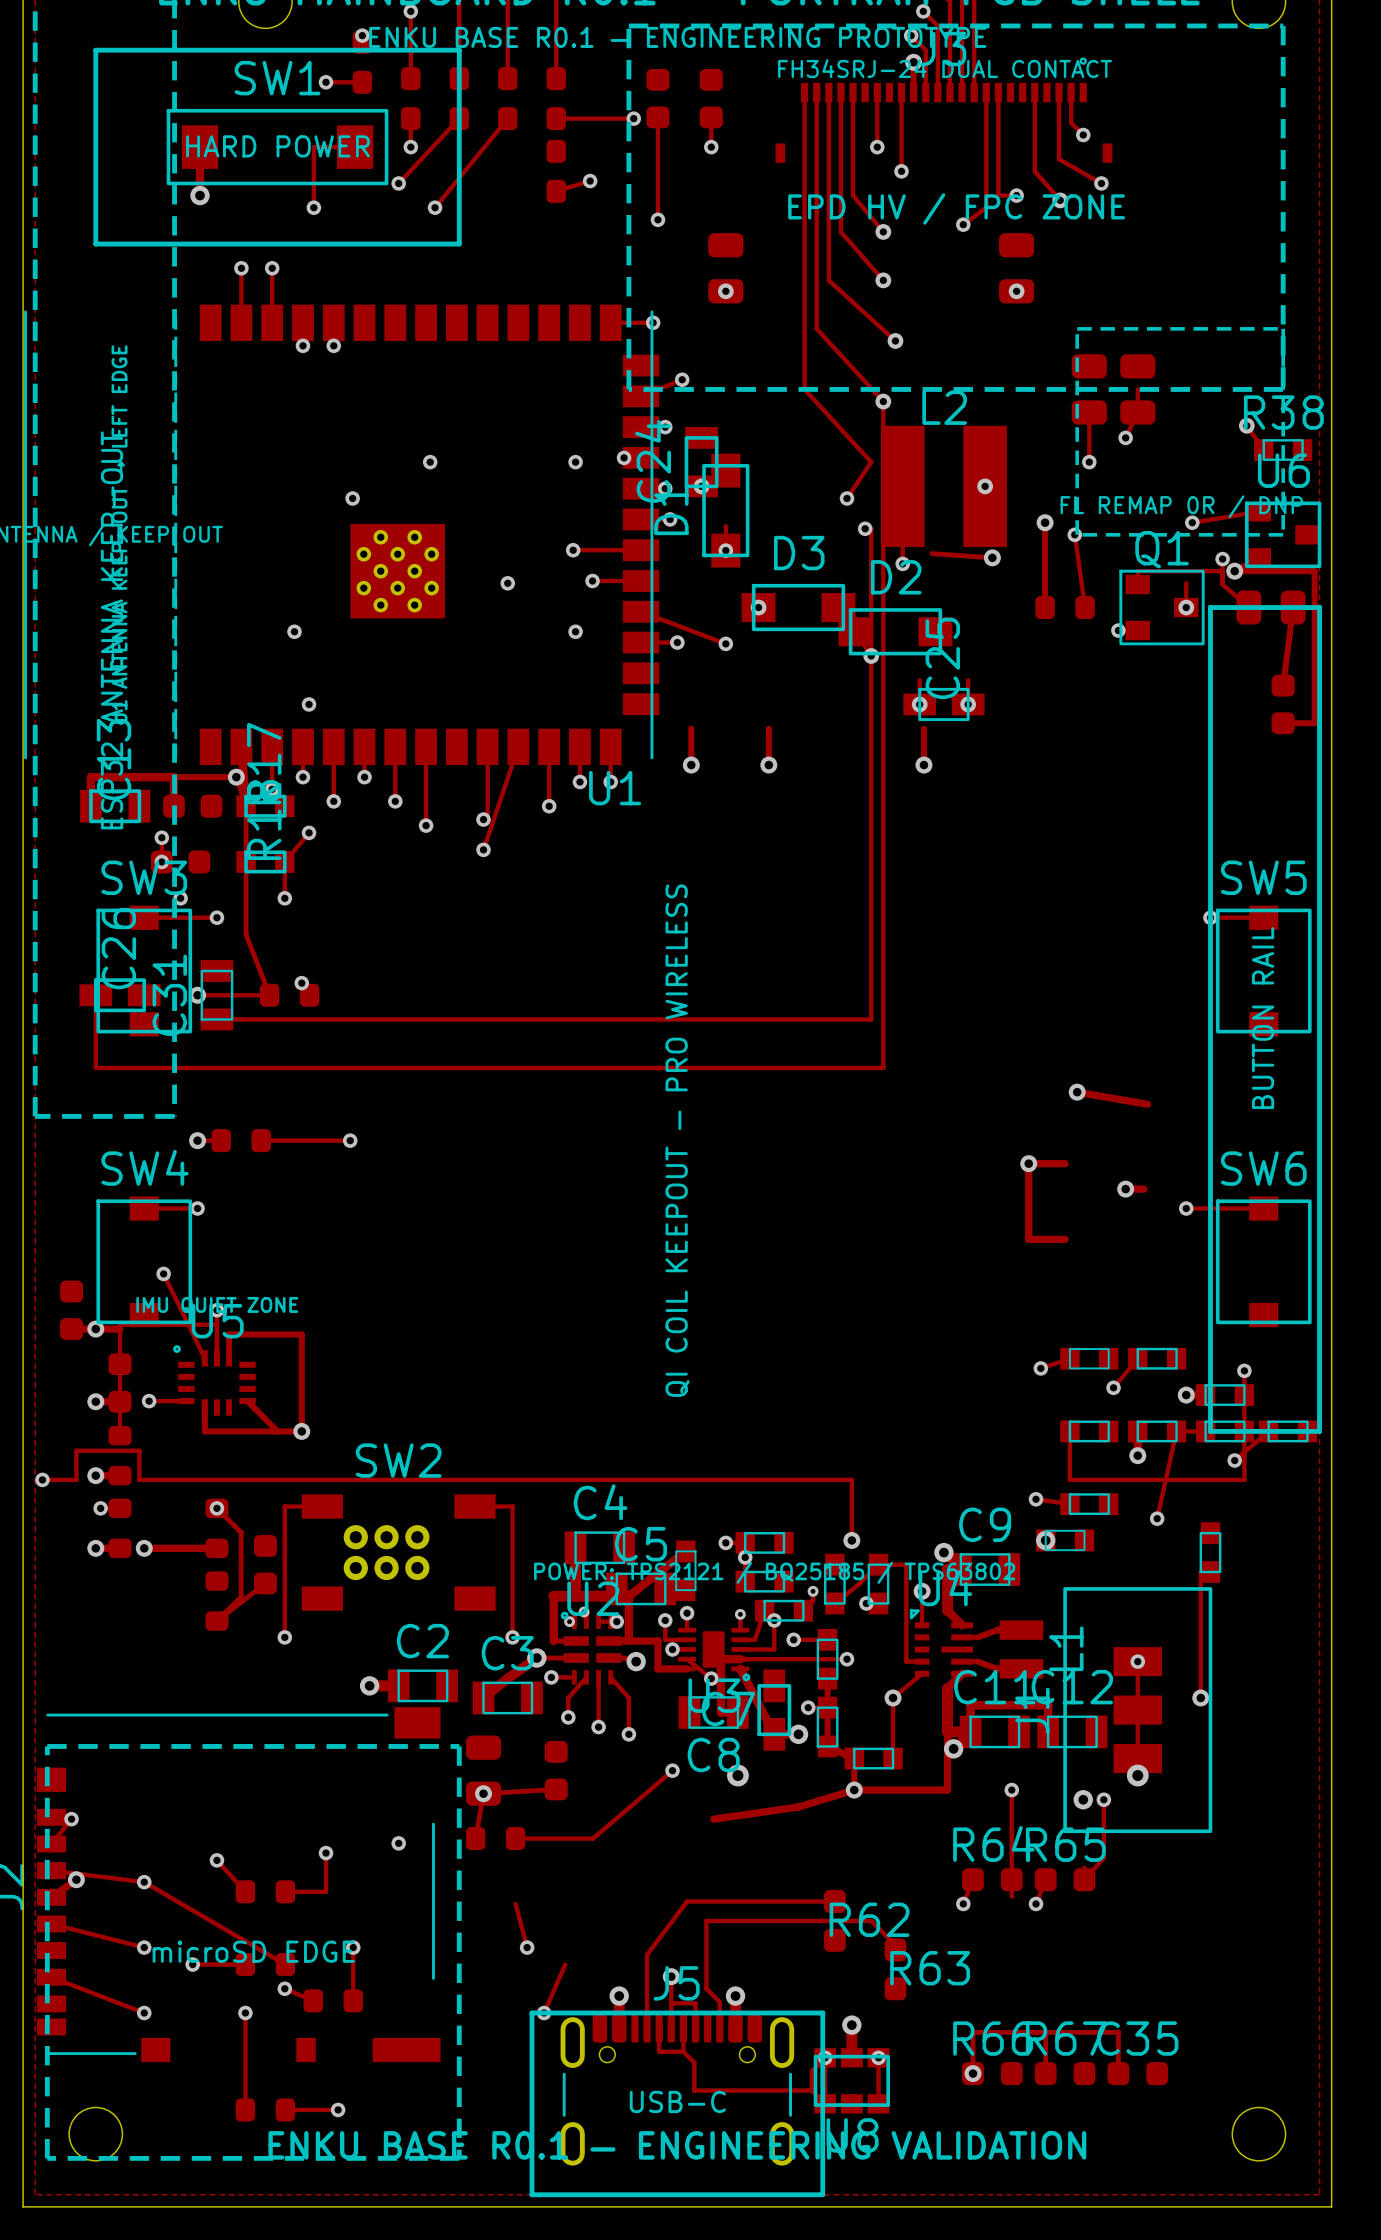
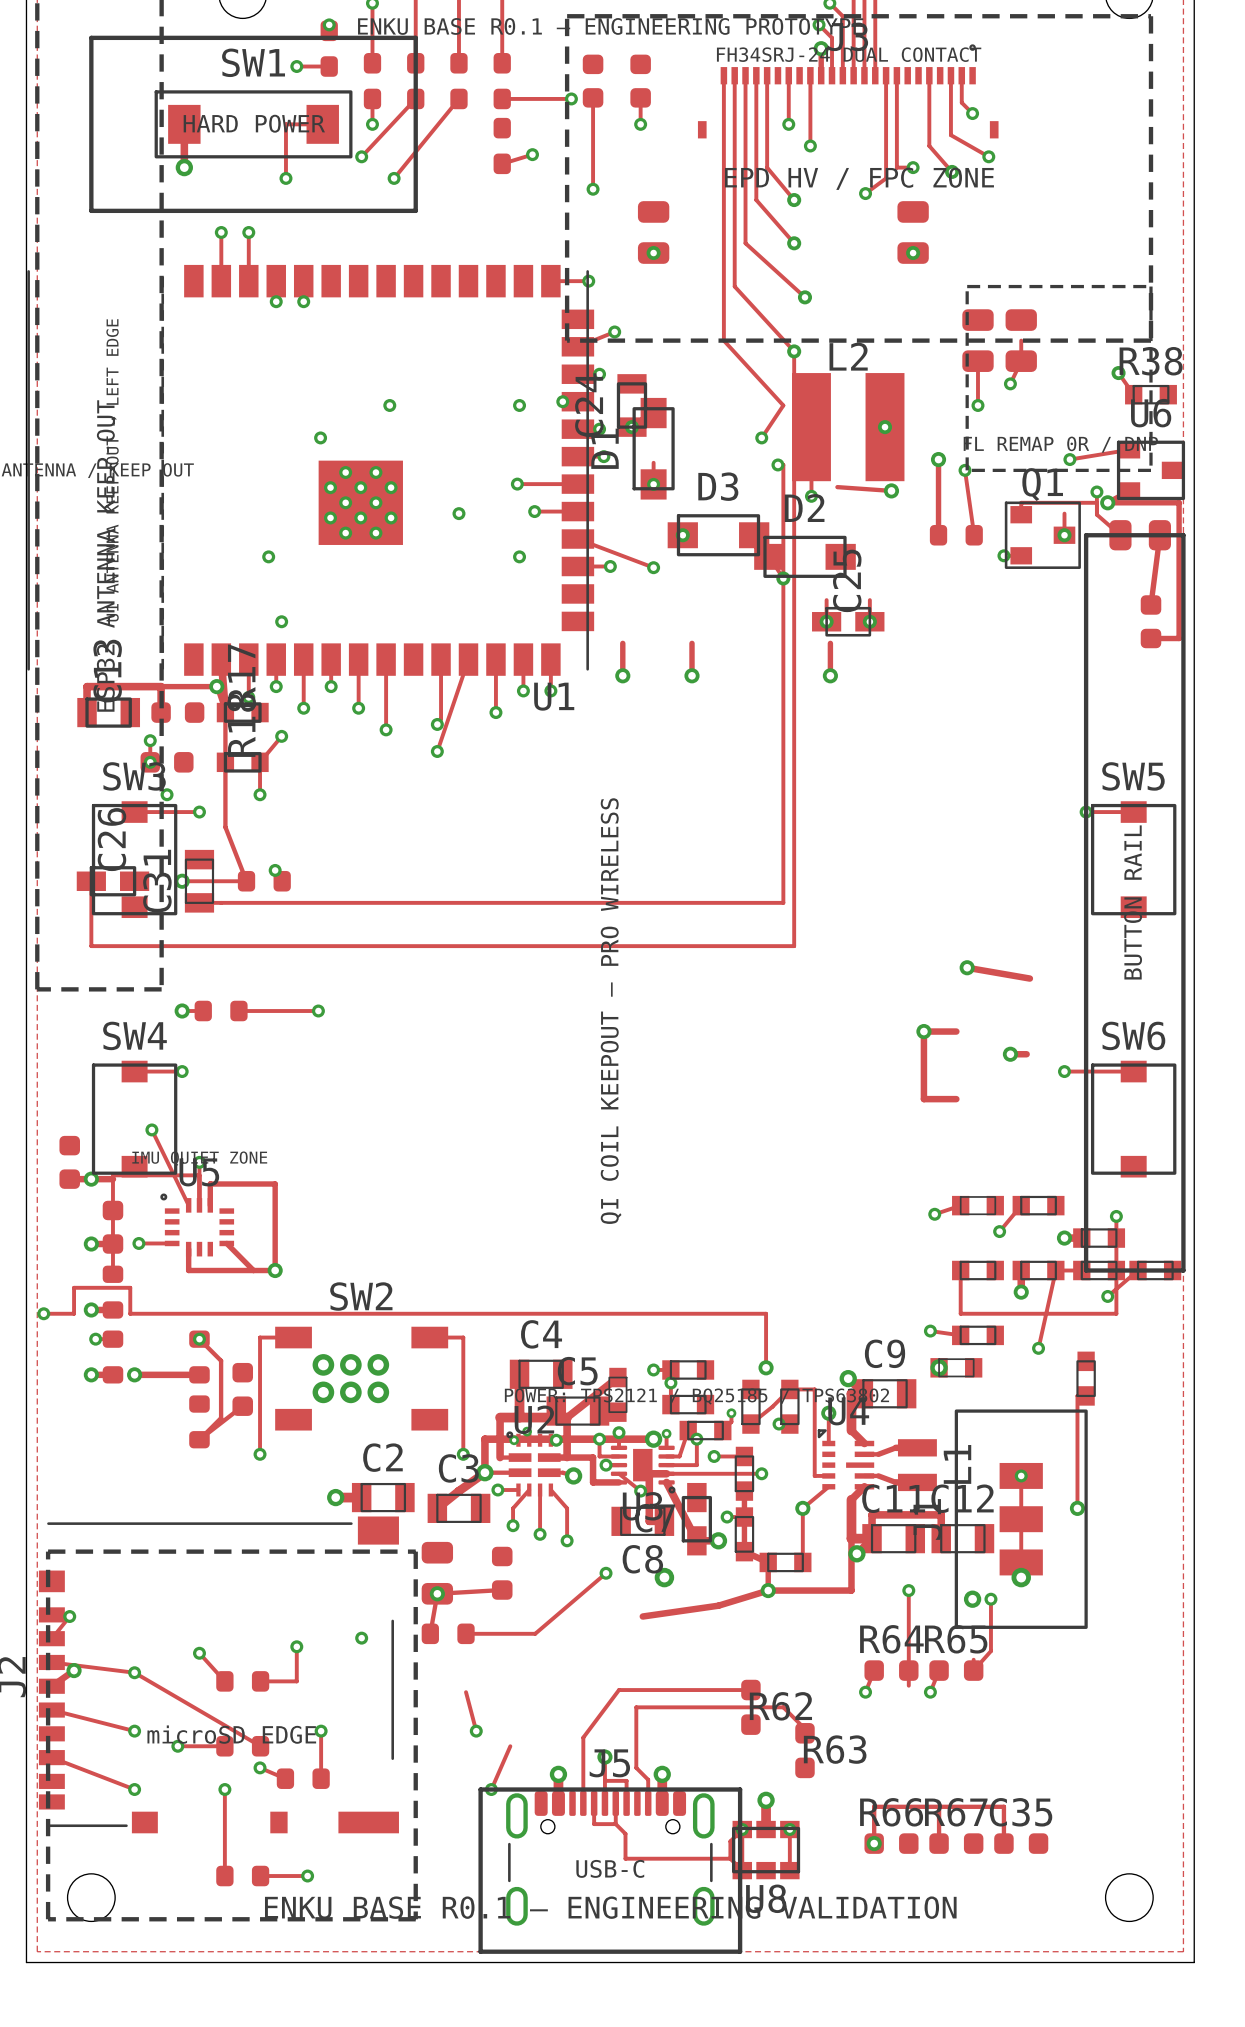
track: none -> (653, 1439) (484, 1439) (484, 1472)
via: none -> (653, 1439)

